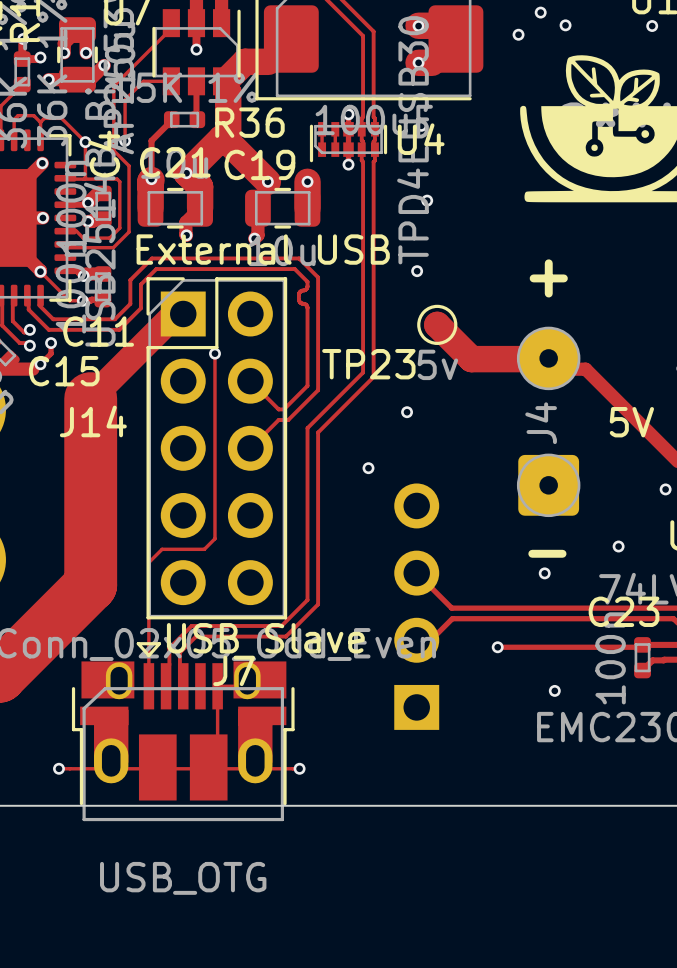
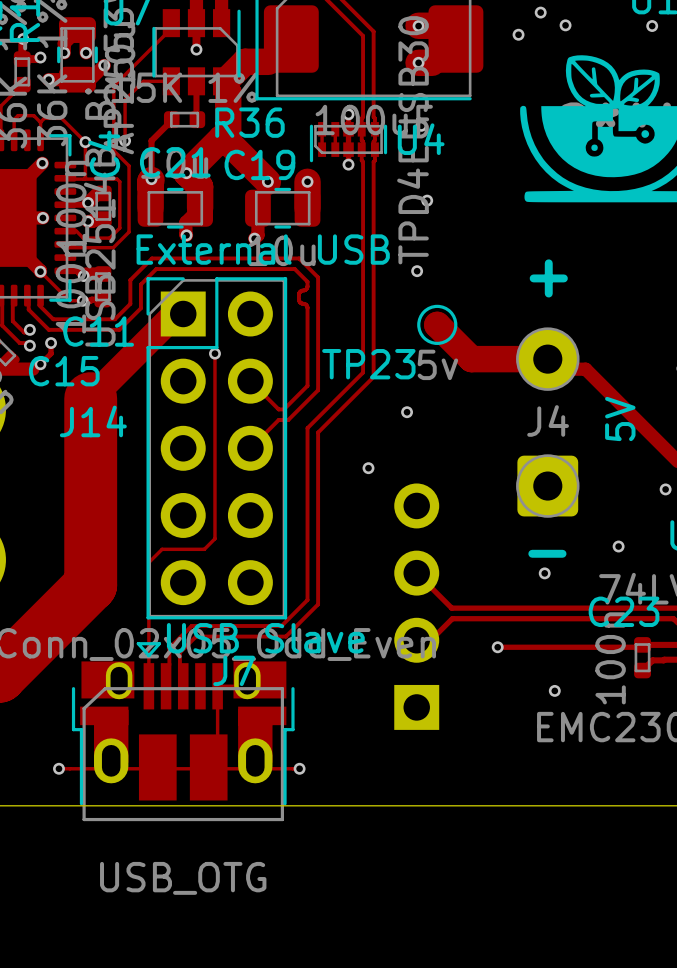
J4 footprint: [516, 326, 581, 518] -> [516, 327, 580, 518]
J4 value rotation: 0° (631, 422) -> 90° counterclockwise (620, 418)
J4 name rotation: 0° (541, 423) -> 90° clockwise (548, 420)

